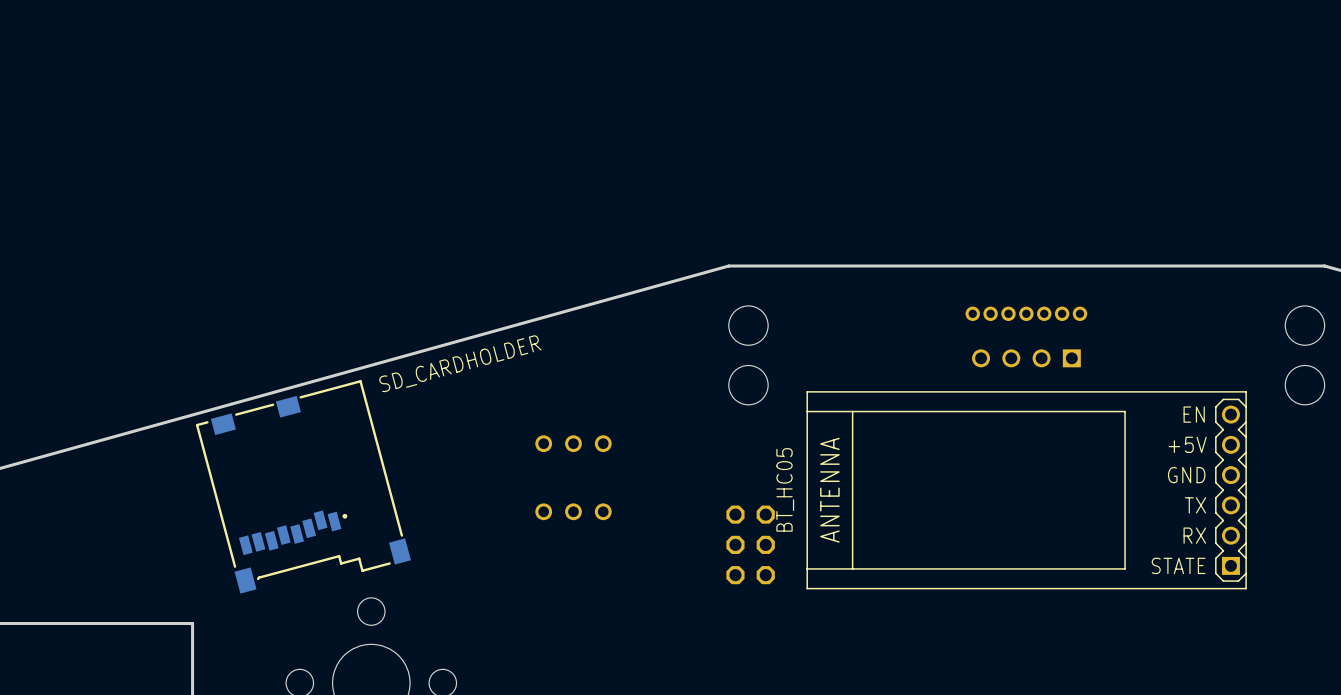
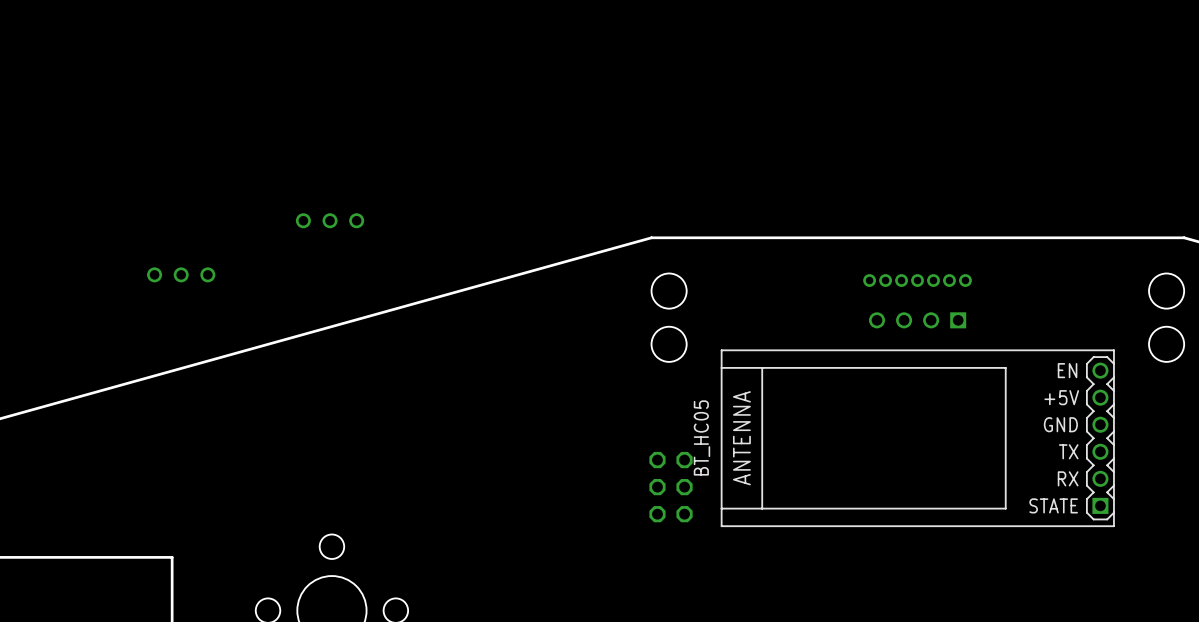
part: none -> (330, 220)
part: none -> (181, 274)
part: (573, 443) -> none
SD_CARDHOLDER: (303, 486) -> none
part: (573, 511) -> none

